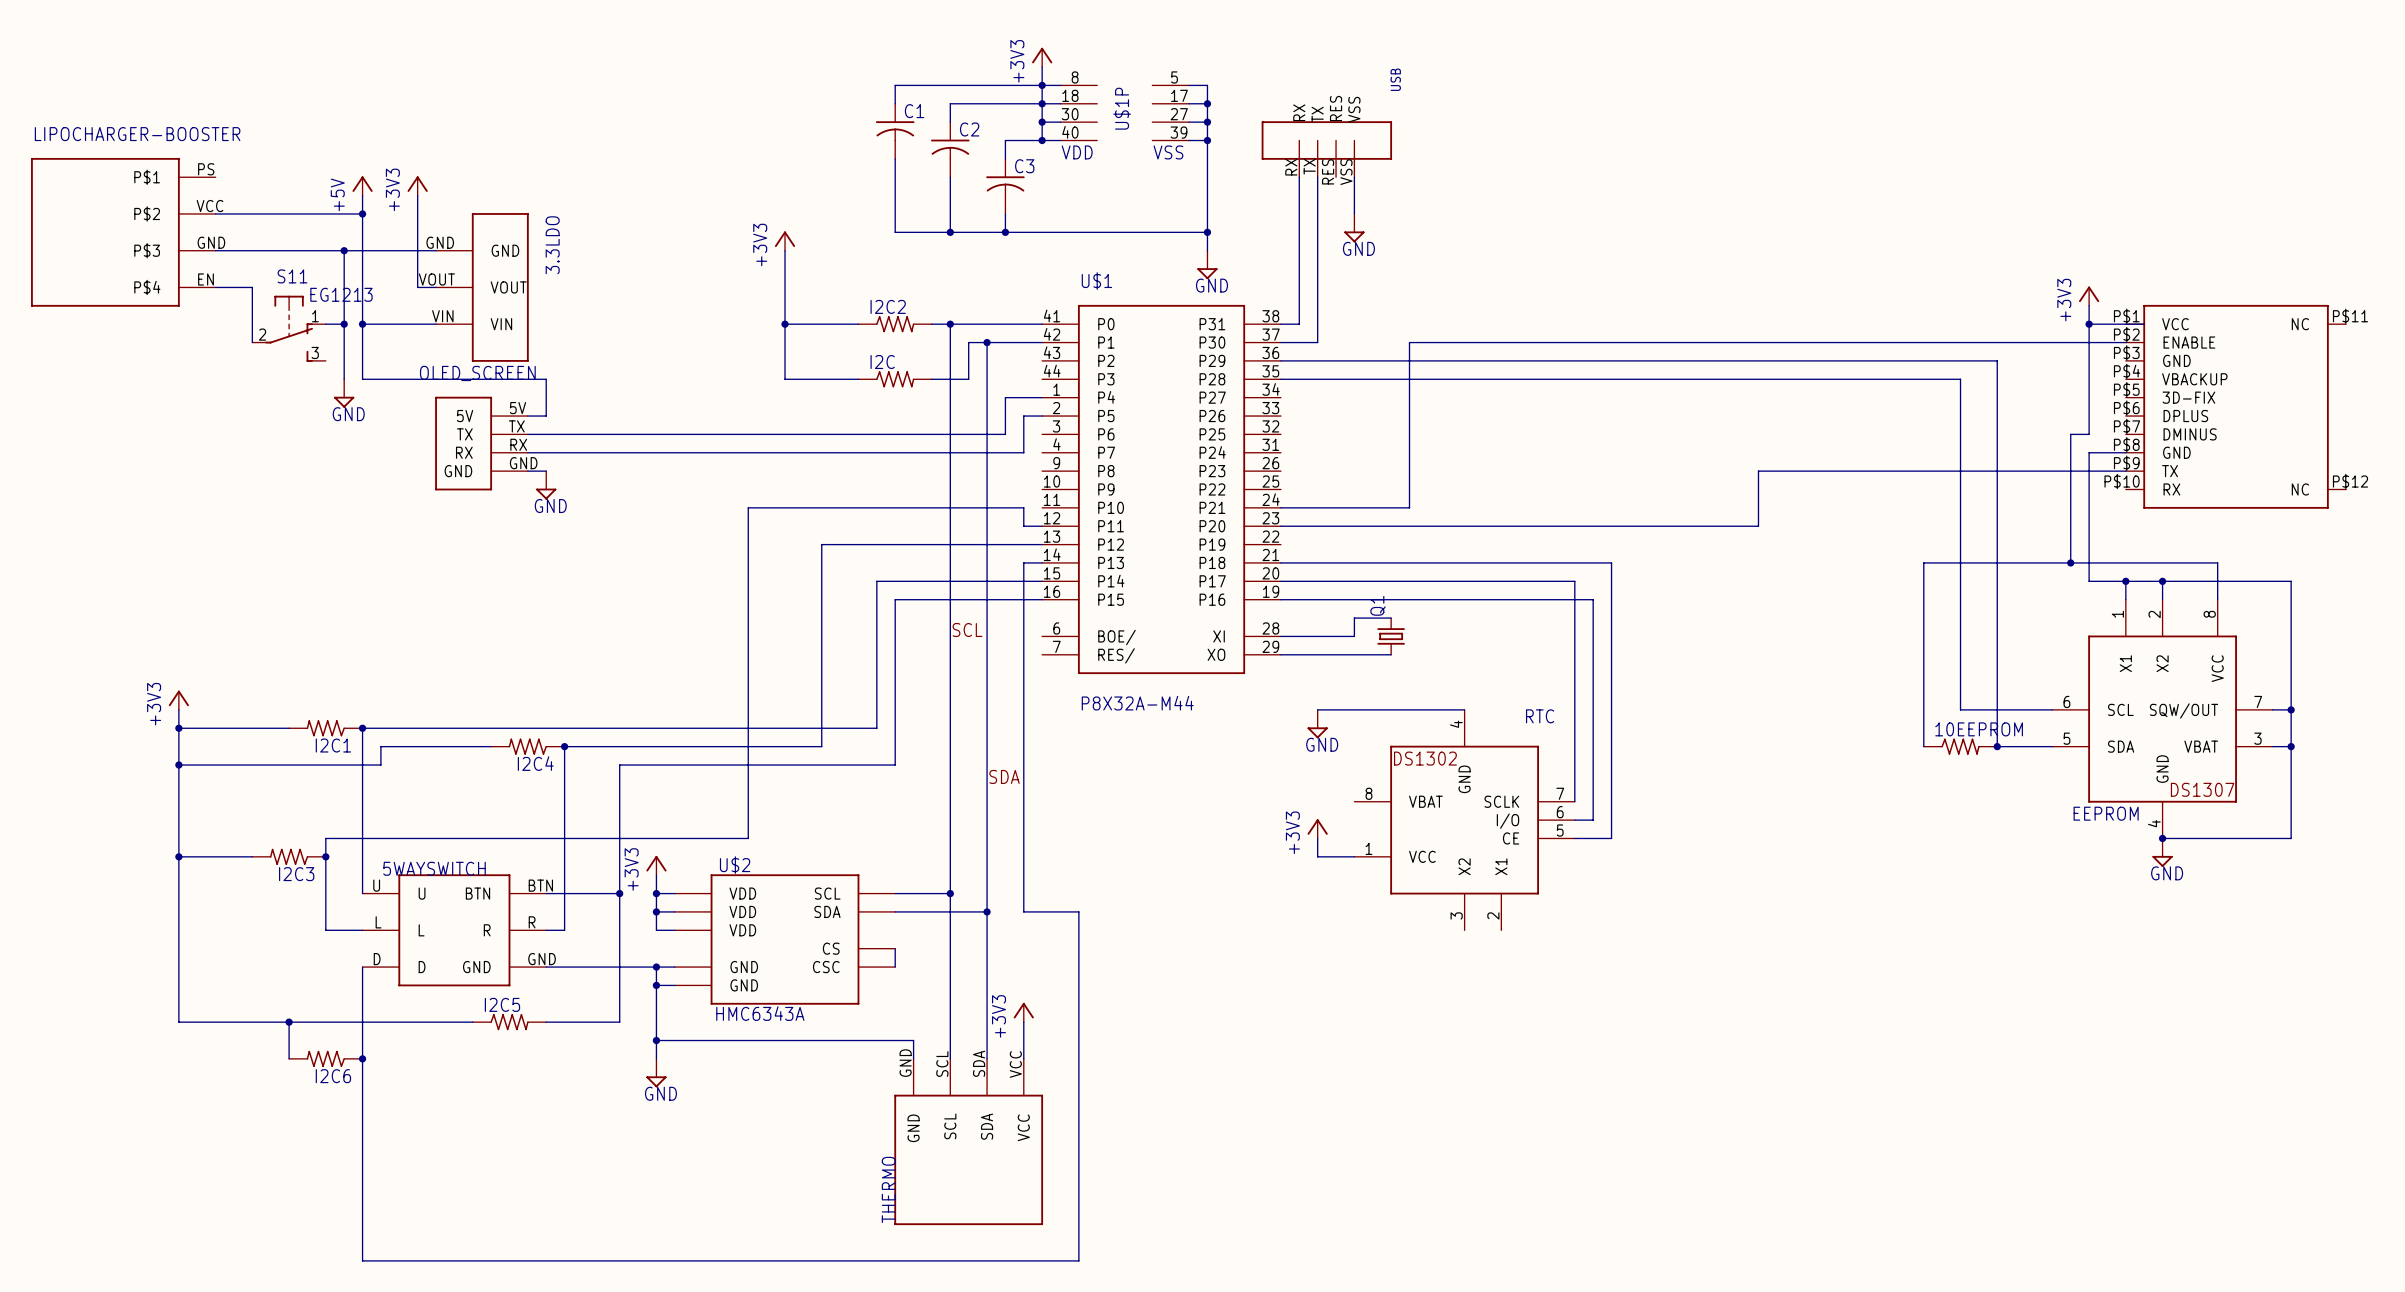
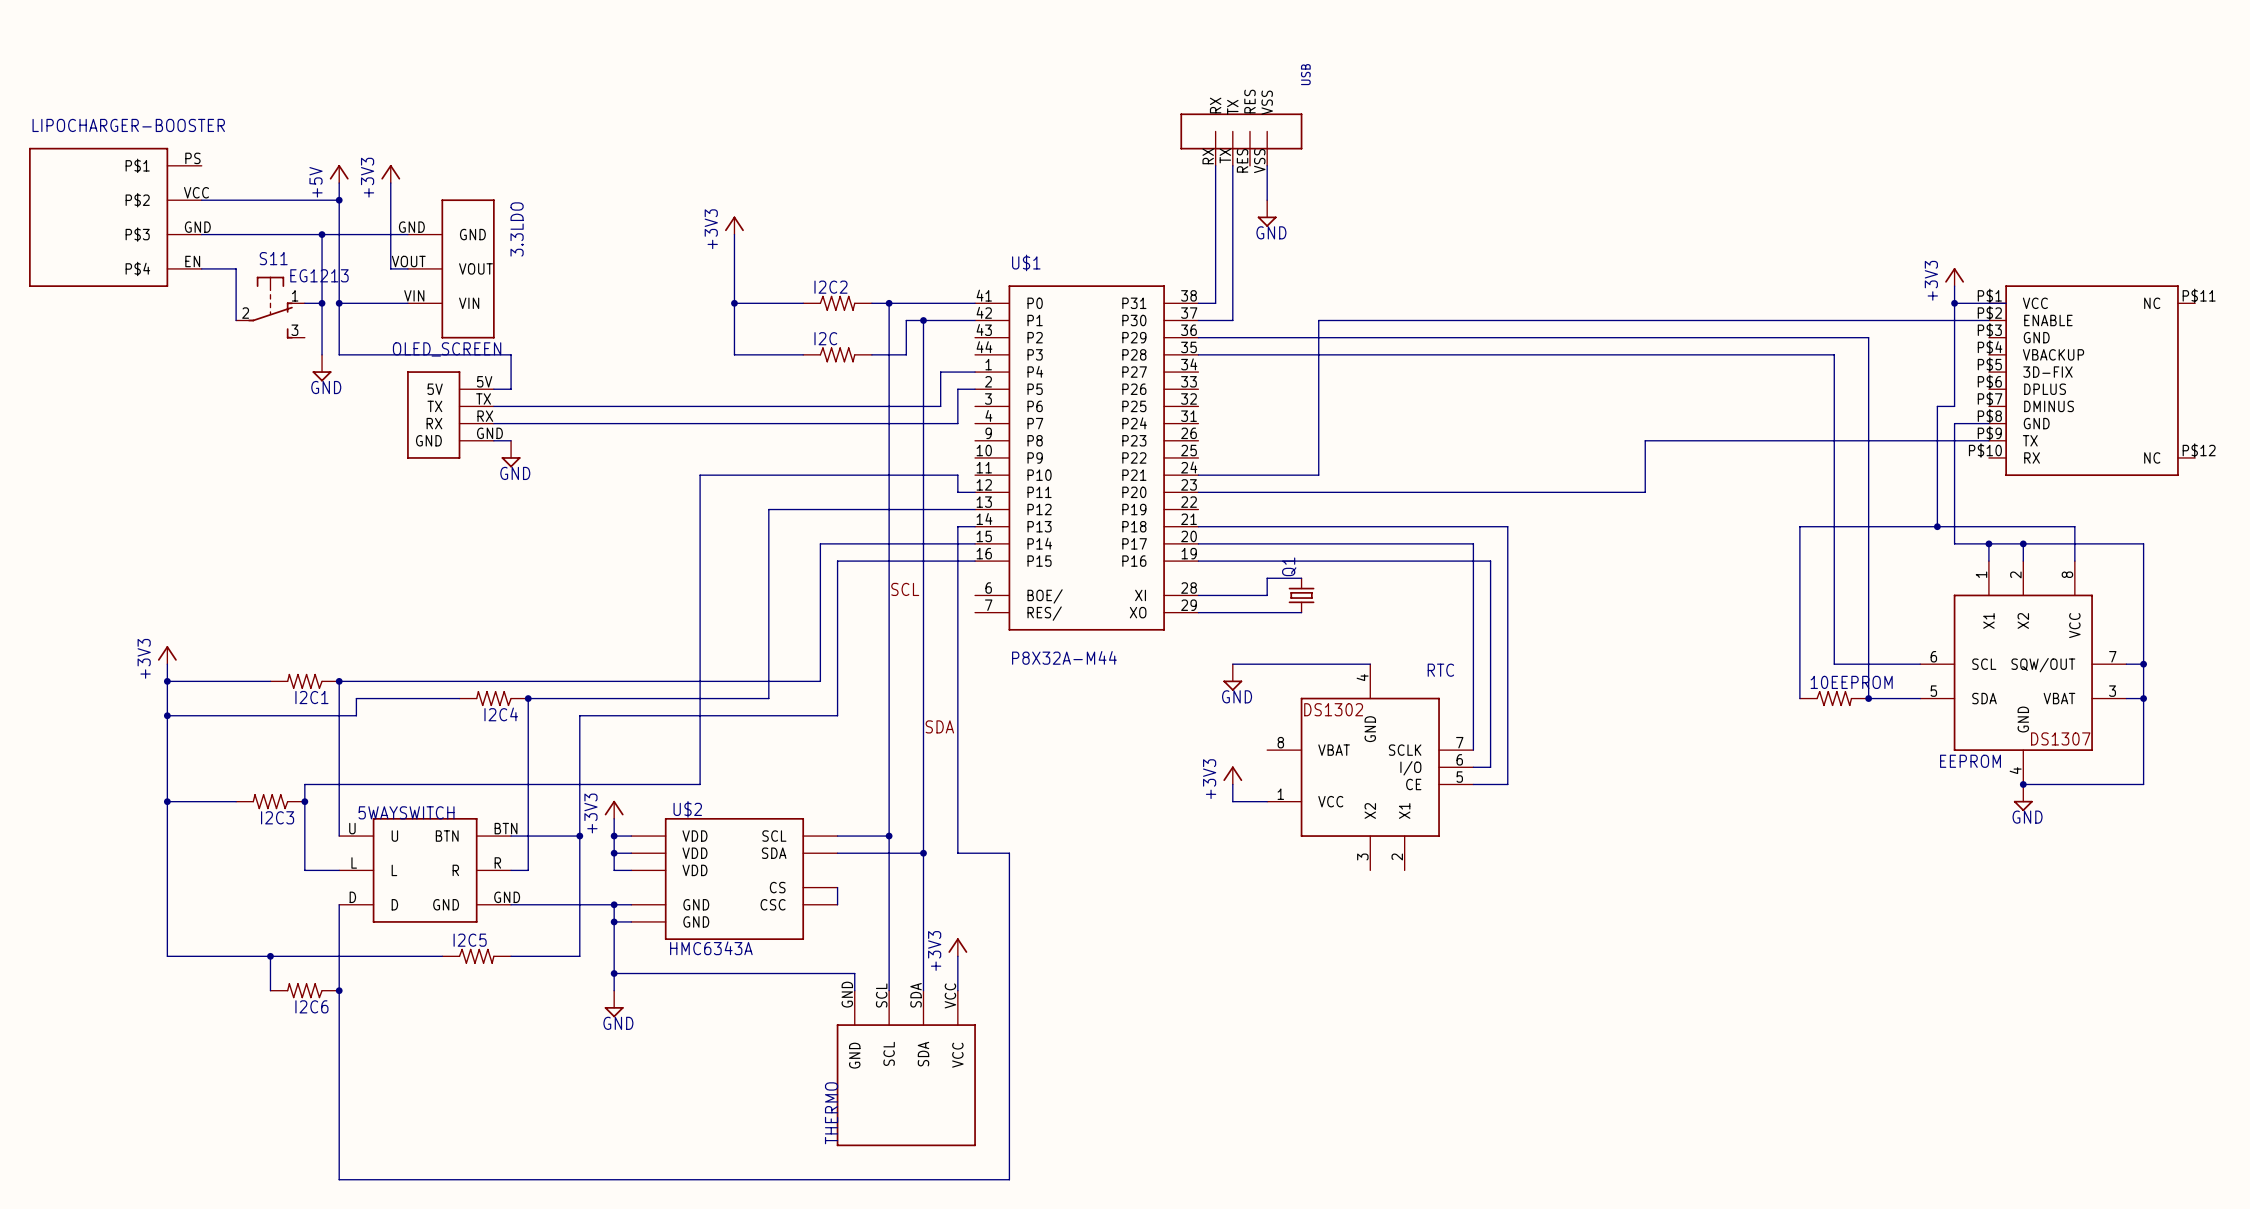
power symbol: +3V3 (1042, 57) -> none
wire: (1042, 67) (1042, 140) -> none
junction: (1042, 85) -> none
wire: (1060, 85) (895, 85) (895, 103) -> none
wire: (1189, 85) (1207, 85) (1207, 250) -> none
junction: (1042, 103) -> none
wire: (1060, 103) (950, 103) (950, 122) -> none
wire: (1189, 103) (1207, 103) -> none
junction: (1207, 103) -> none
U$1P: (1124, 112) -> none
wire: (1042, 122) (1060, 122) -> none
junction: (1042, 122) -> none
wire: (1189, 122) (1207, 122) -> none
junction: (1207, 122) -> none
C1: (895, 131) -> none
junction: (1042, 140) -> none
wire: (1060, 140) (1005, 140) (1005, 158) -> none
wire: (1189, 140) (1207, 140) -> none
junction: (1207, 140) -> none
C2: (950, 149) -> none
wire: (895, 158) (895, 232) (1207, 232) -> none
wire: (950, 177) (950, 232) -> none
C3: (1005, 186) -> none
wire: (1005, 213) (1005, 232) -> none
junction: (950, 232) -> none
junction: (1005, 232) -> none
junction: (1207, 232) -> none
power symbol: GND (1207, 264) -> none

